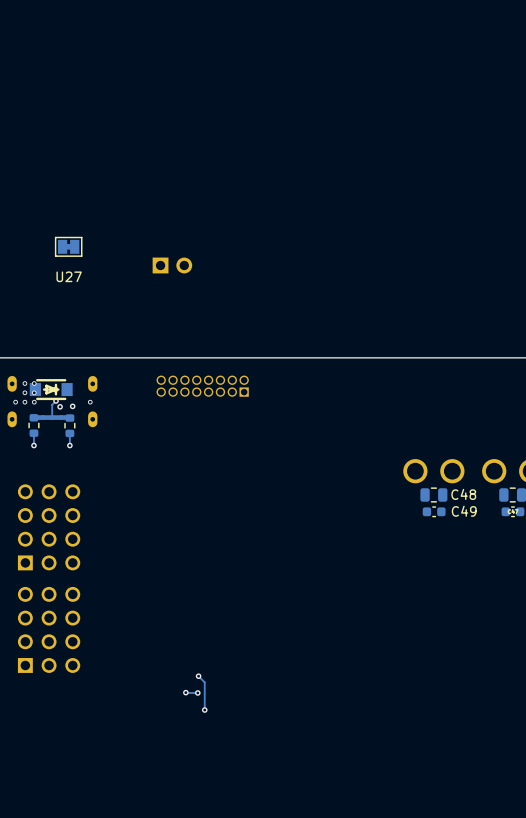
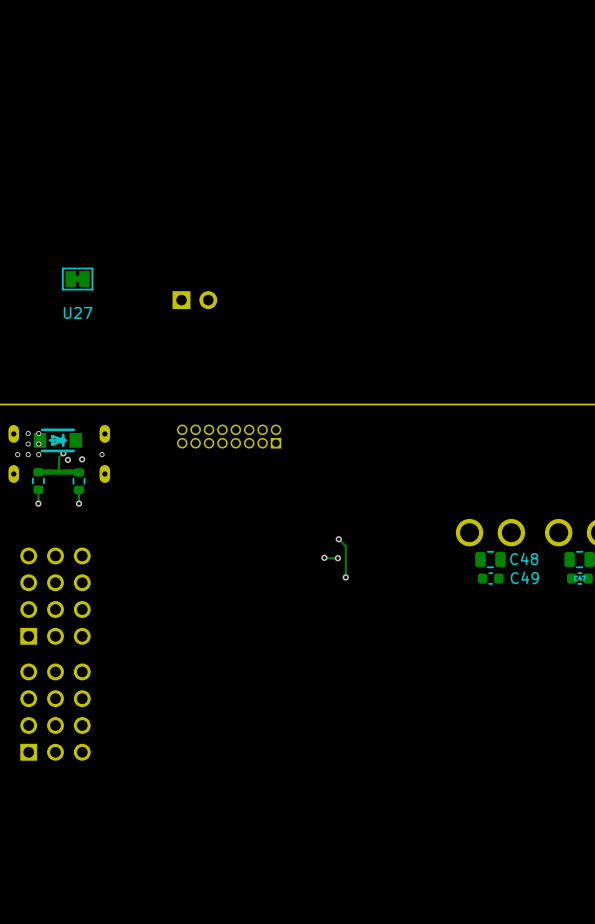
via: none -> (338, 539)
via: none -> (324, 557)
via: none -> (337, 558)
via: none -> (345, 577)
track: (198, 676) (204, 682) (204, 710) -> (338, 539) (345, 546) (345, 577)
via: (198, 676) -> none
track: (185, 692) (197, 692) -> (324, 557) (337, 558)
via: (185, 692) -> none
via: (197, 692) -> none
via: (204, 710) -> none

